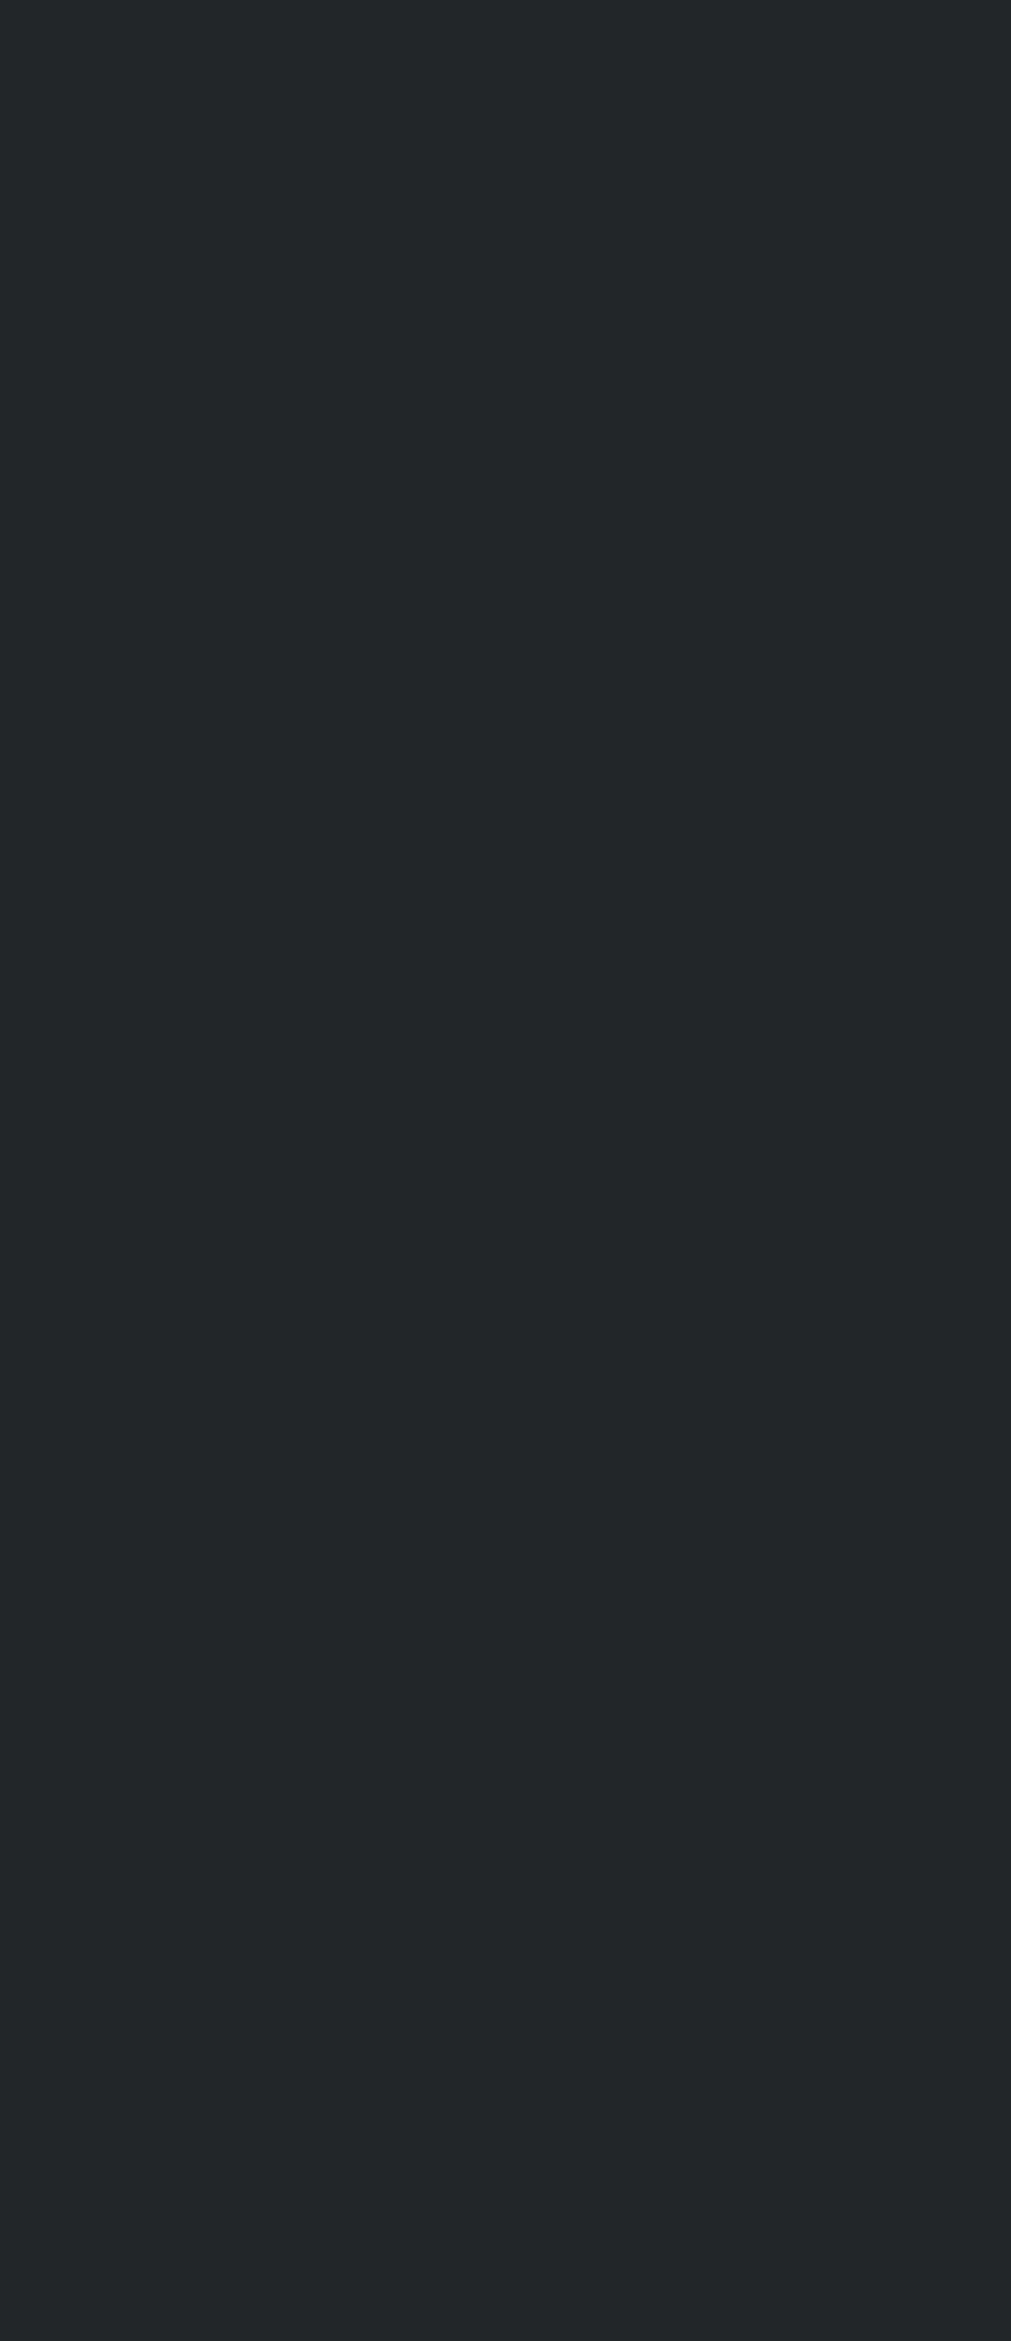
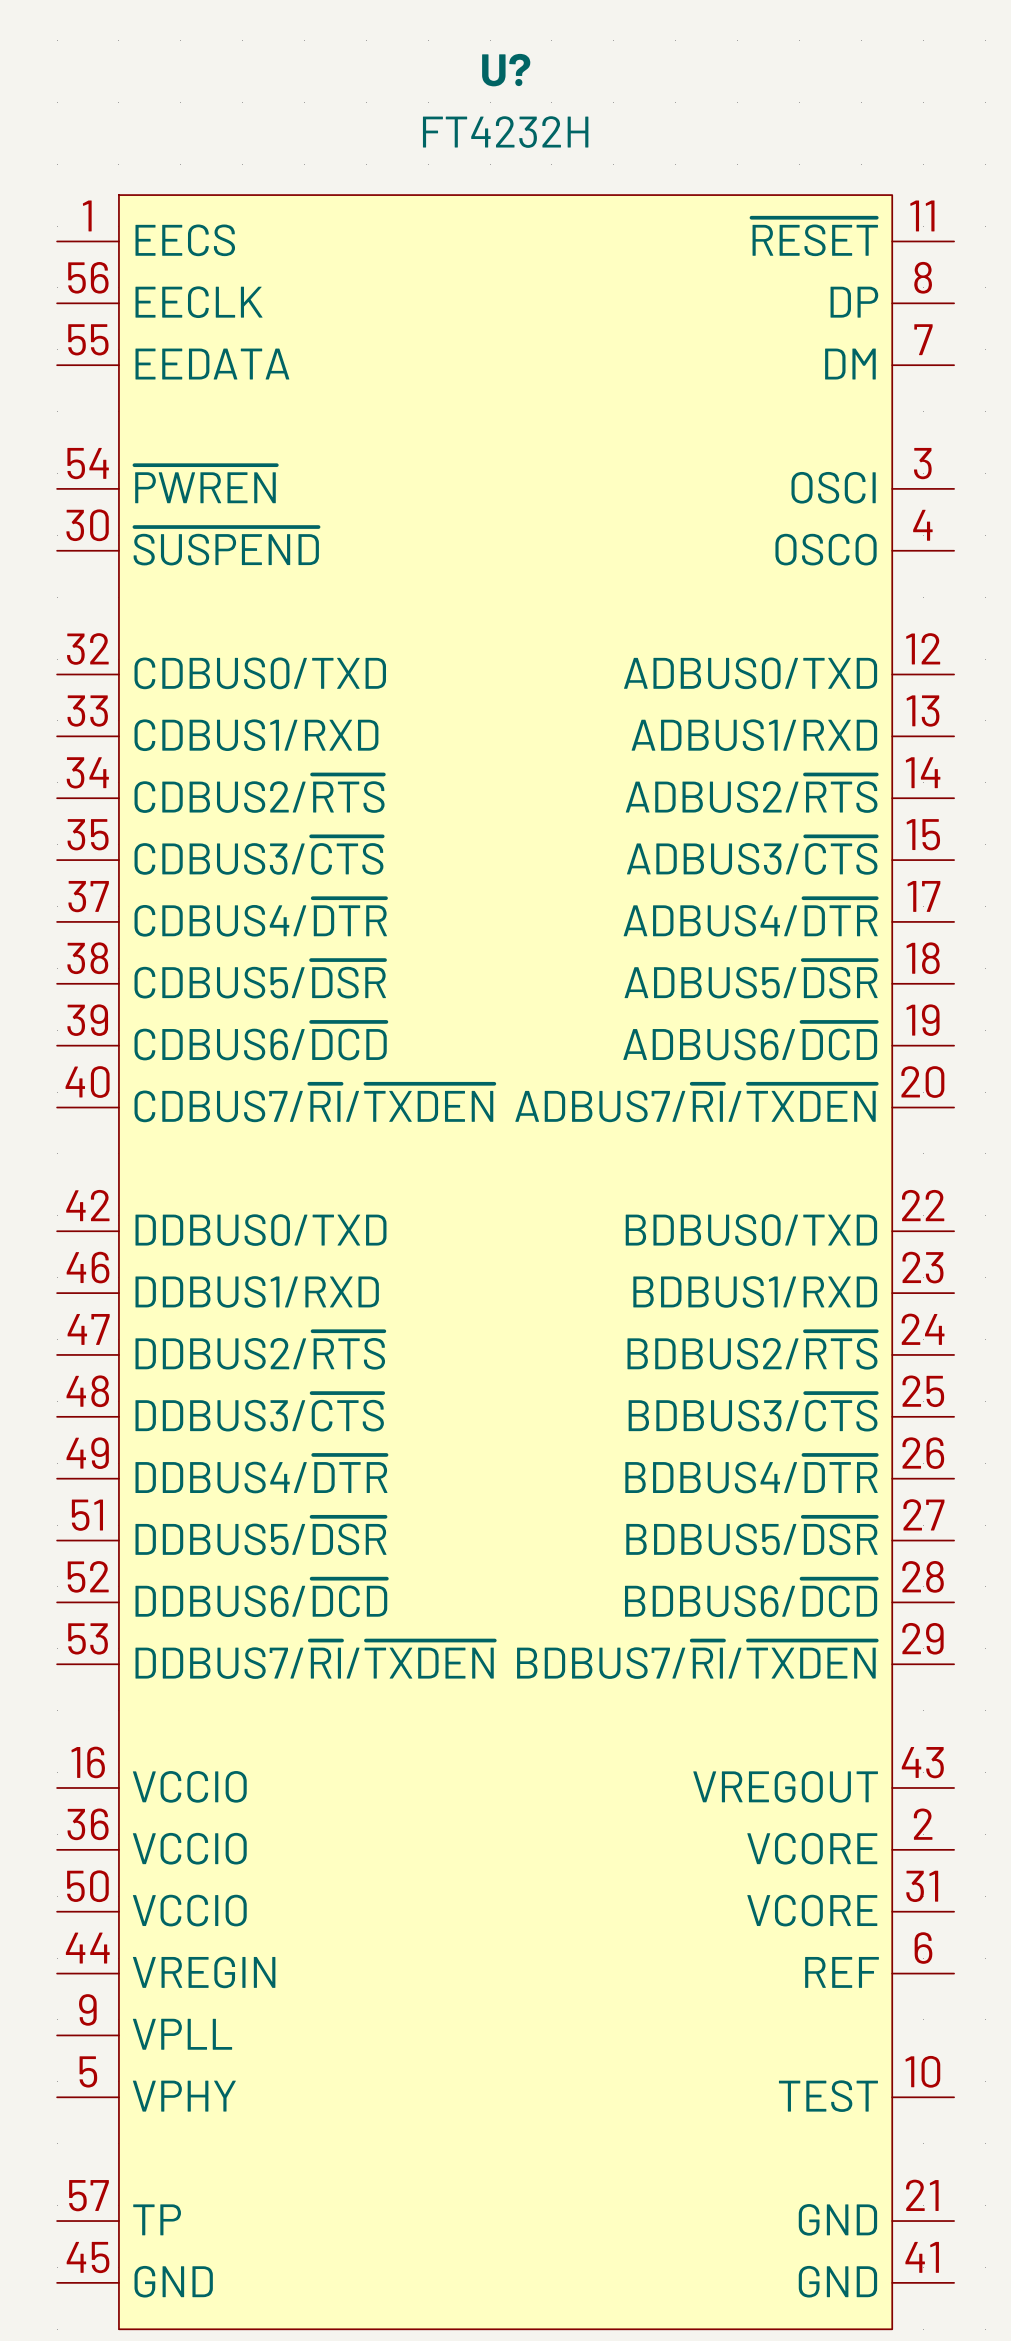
U?: none -> FT4232H (505, 1262)

